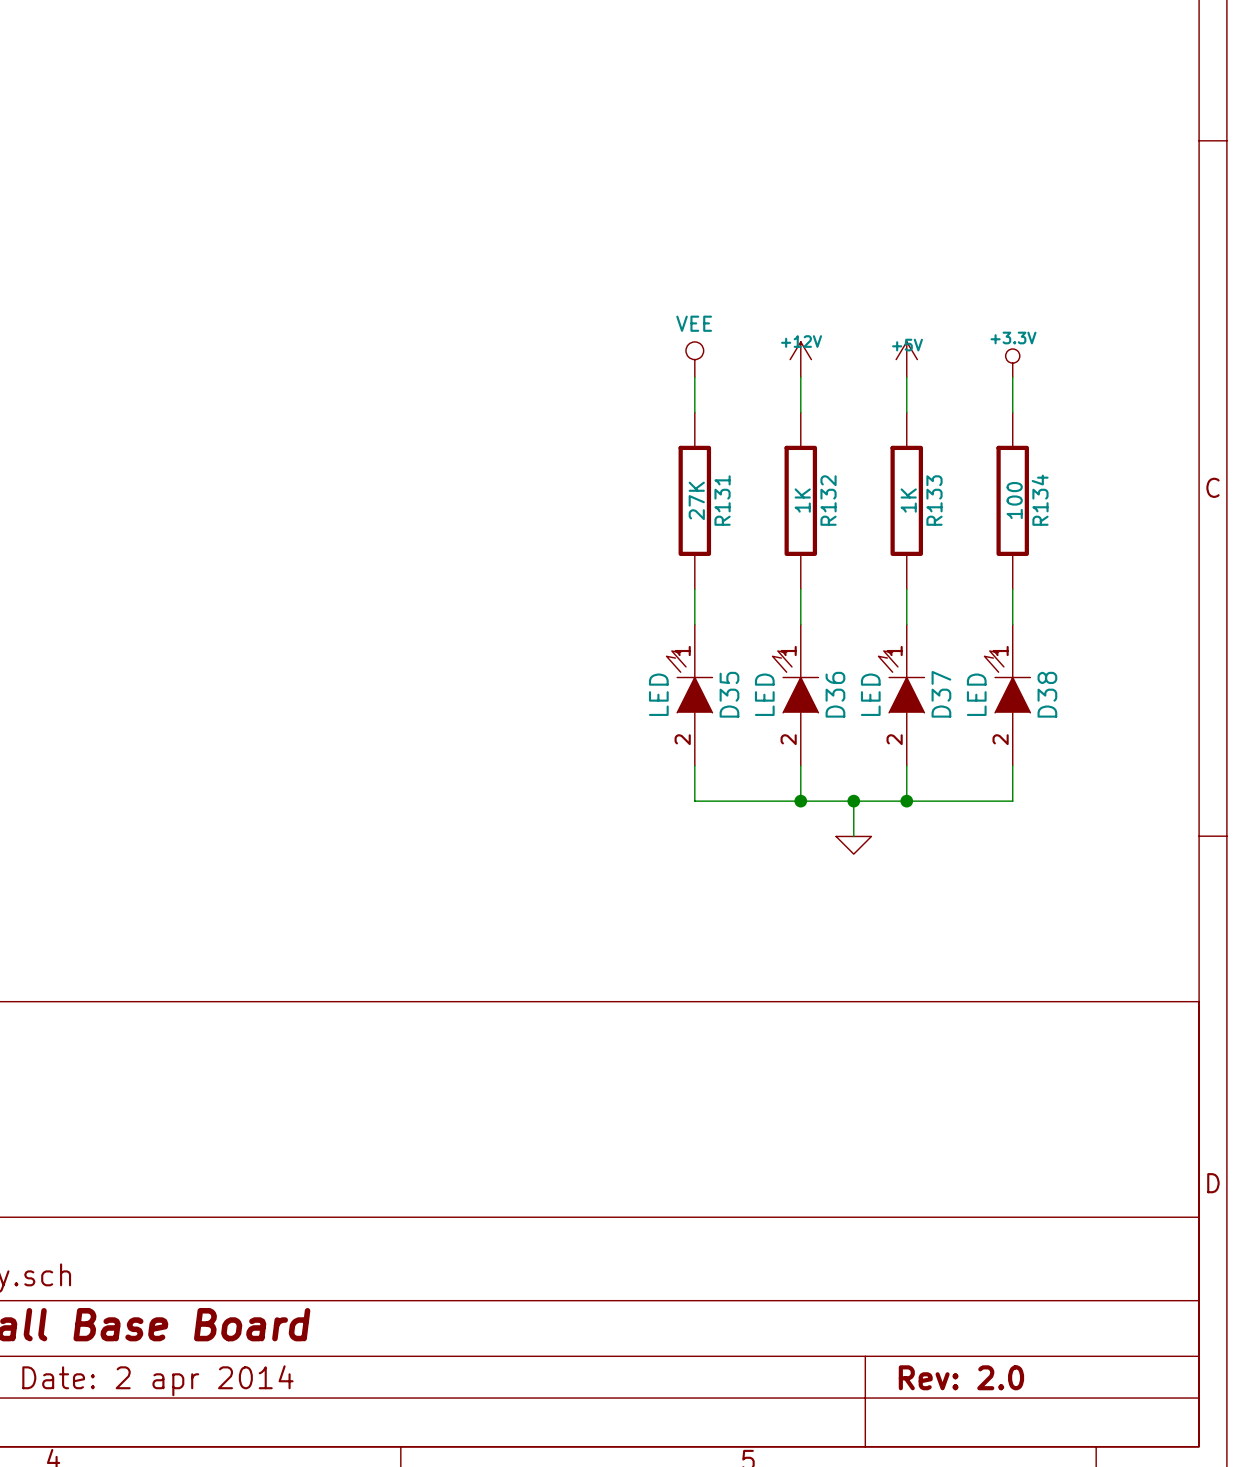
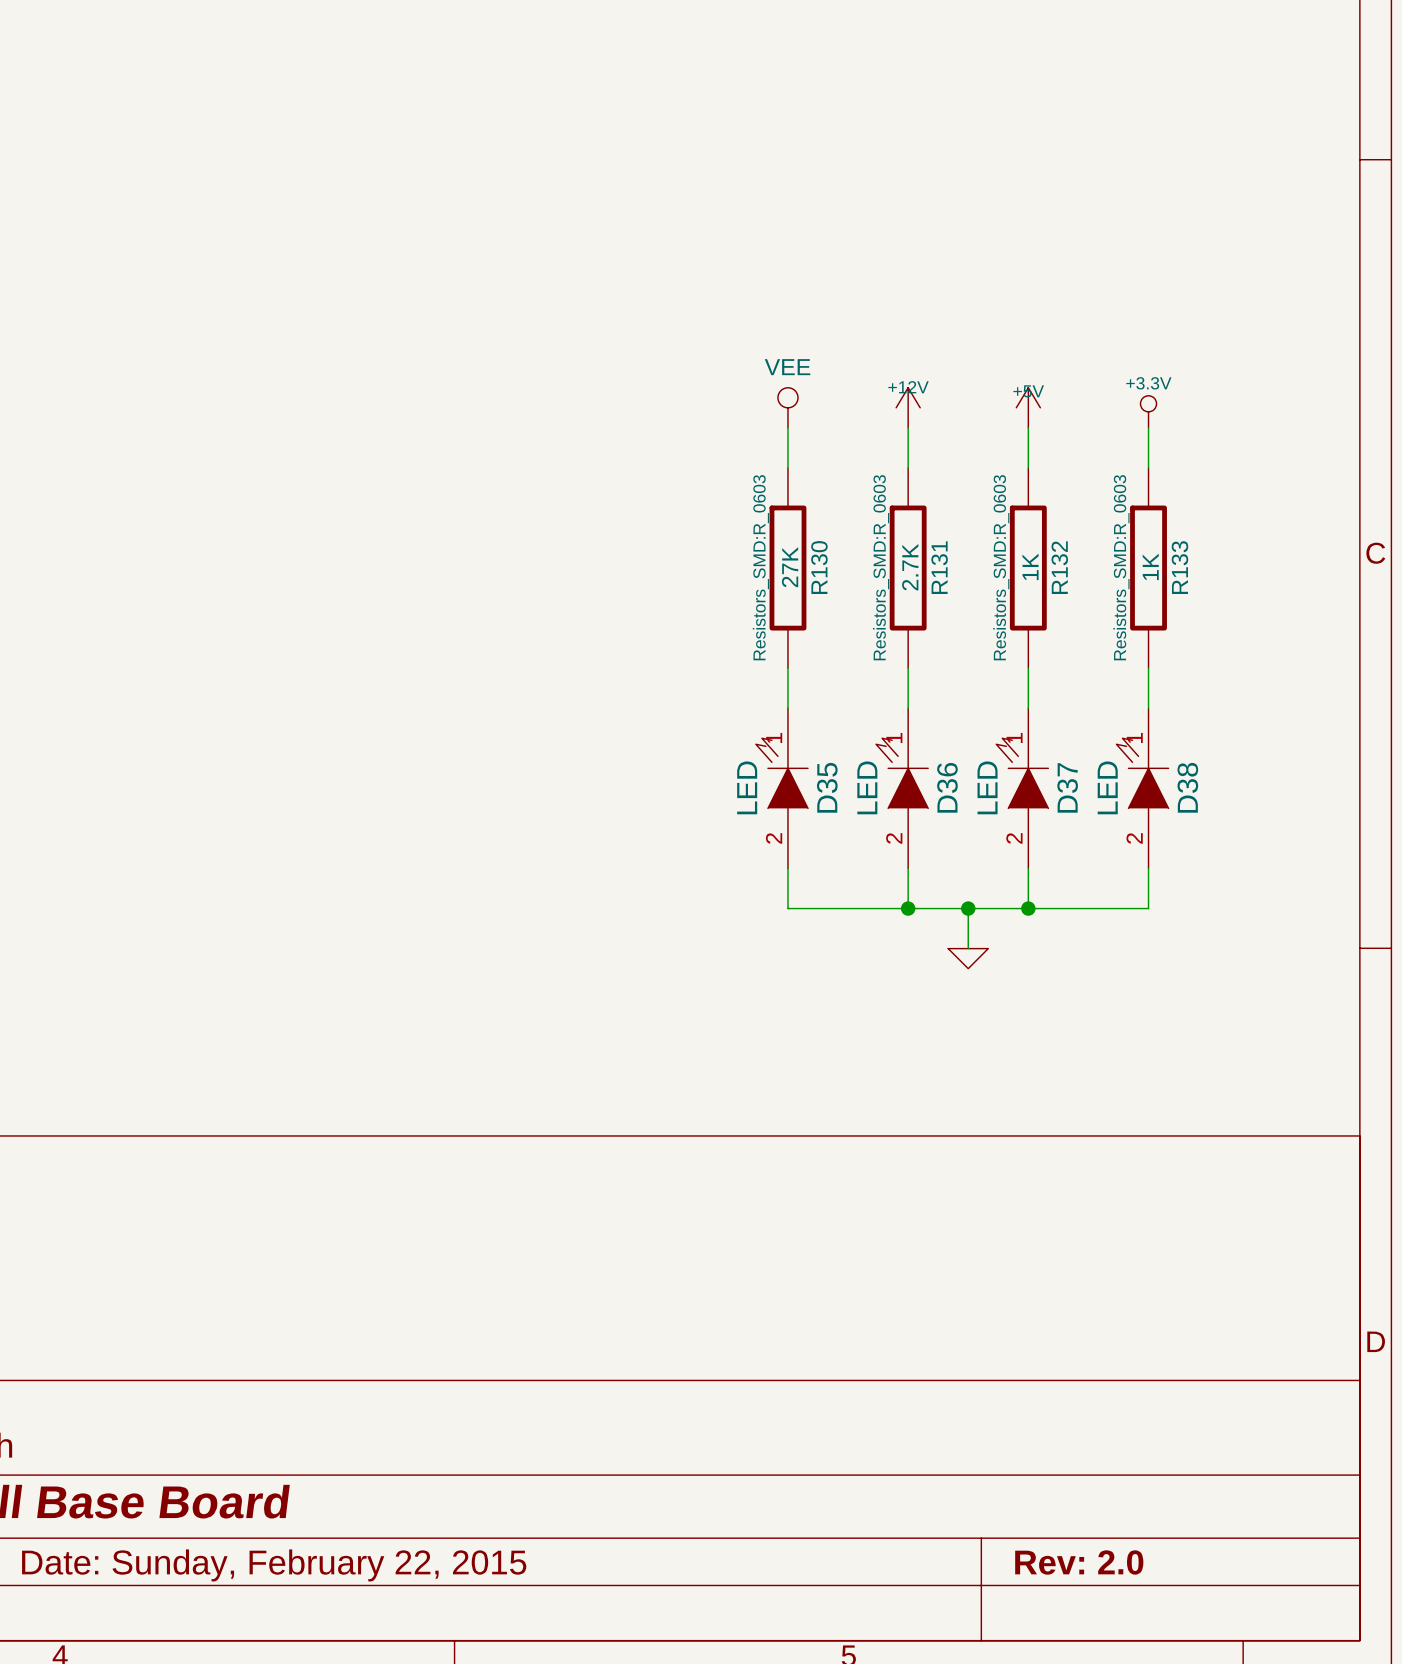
R131 text: none -> Resistors_SMD:R_0603 (760, 567)
R131 name: R131 (722, 500) -> R130 (819, 567)
R132 text: none -> Resistors_SMD:R_0603 (881, 567)
R132 value: 1K (802, 500) -> 2.7K (910, 567)
R132 name: R132 (828, 500) -> R131 (939, 567)
R133 text: none -> Resistors_SMD:R_0603 (1001, 567)
R133 name: R133 (934, 500) -> R132 (1059, 567)
R134 text: none -> Resistors_SMD:R_0603 (1121, 567)
R134 value: 100 (1014, 500) -> 1K (1150, 566)
R134 name: R134 (1040, 500) -> R133 (1179, 567)
title block: Date: 2 apr 2014 (157, 1380) -> Date: Sunday, February 22, 2015 (274, 1565)

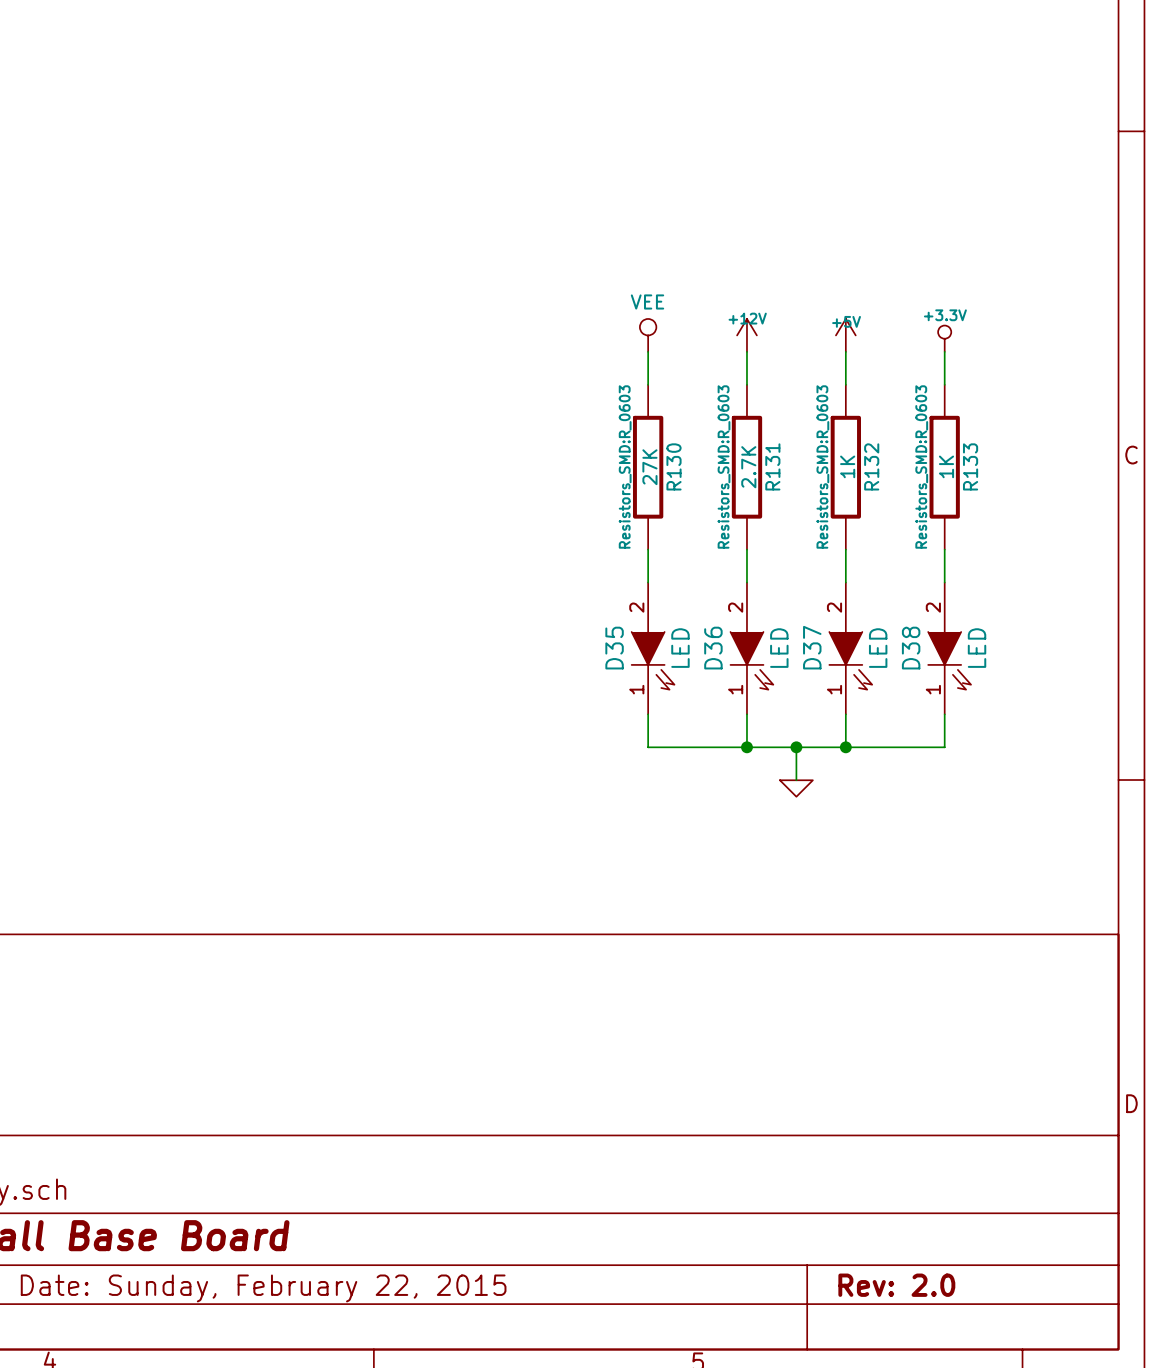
D35 rotation: 0° (781, 773) -> 180° (653, 660)
D36 rotation: 0° (902, 773) -> 180° (751, 660)
D37 rotation: 0° (1022, 773) -> 180° (850, 660)
D38 rotation: 0° (1142, 773) -> 180° (949, 660)

